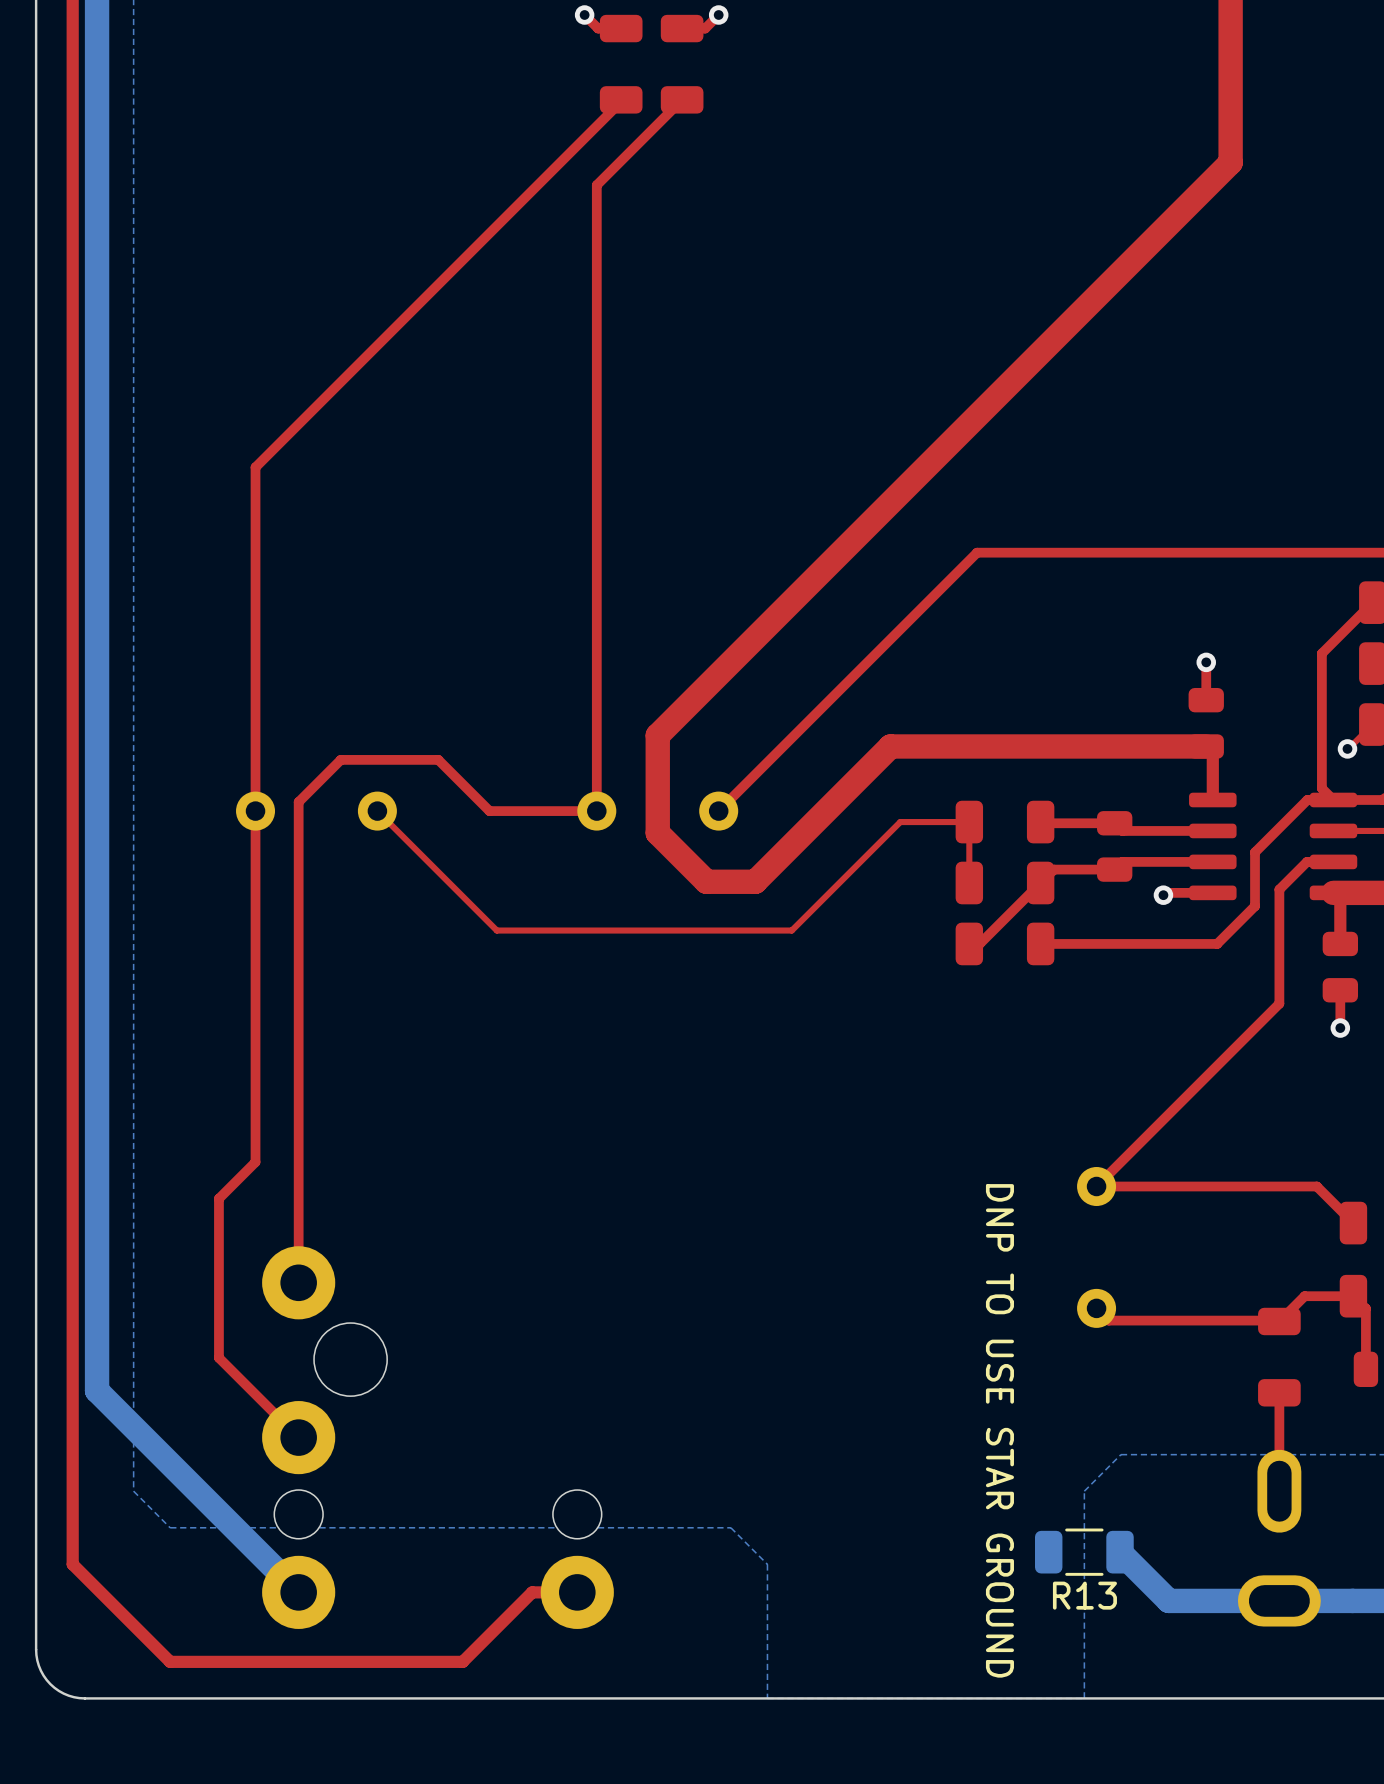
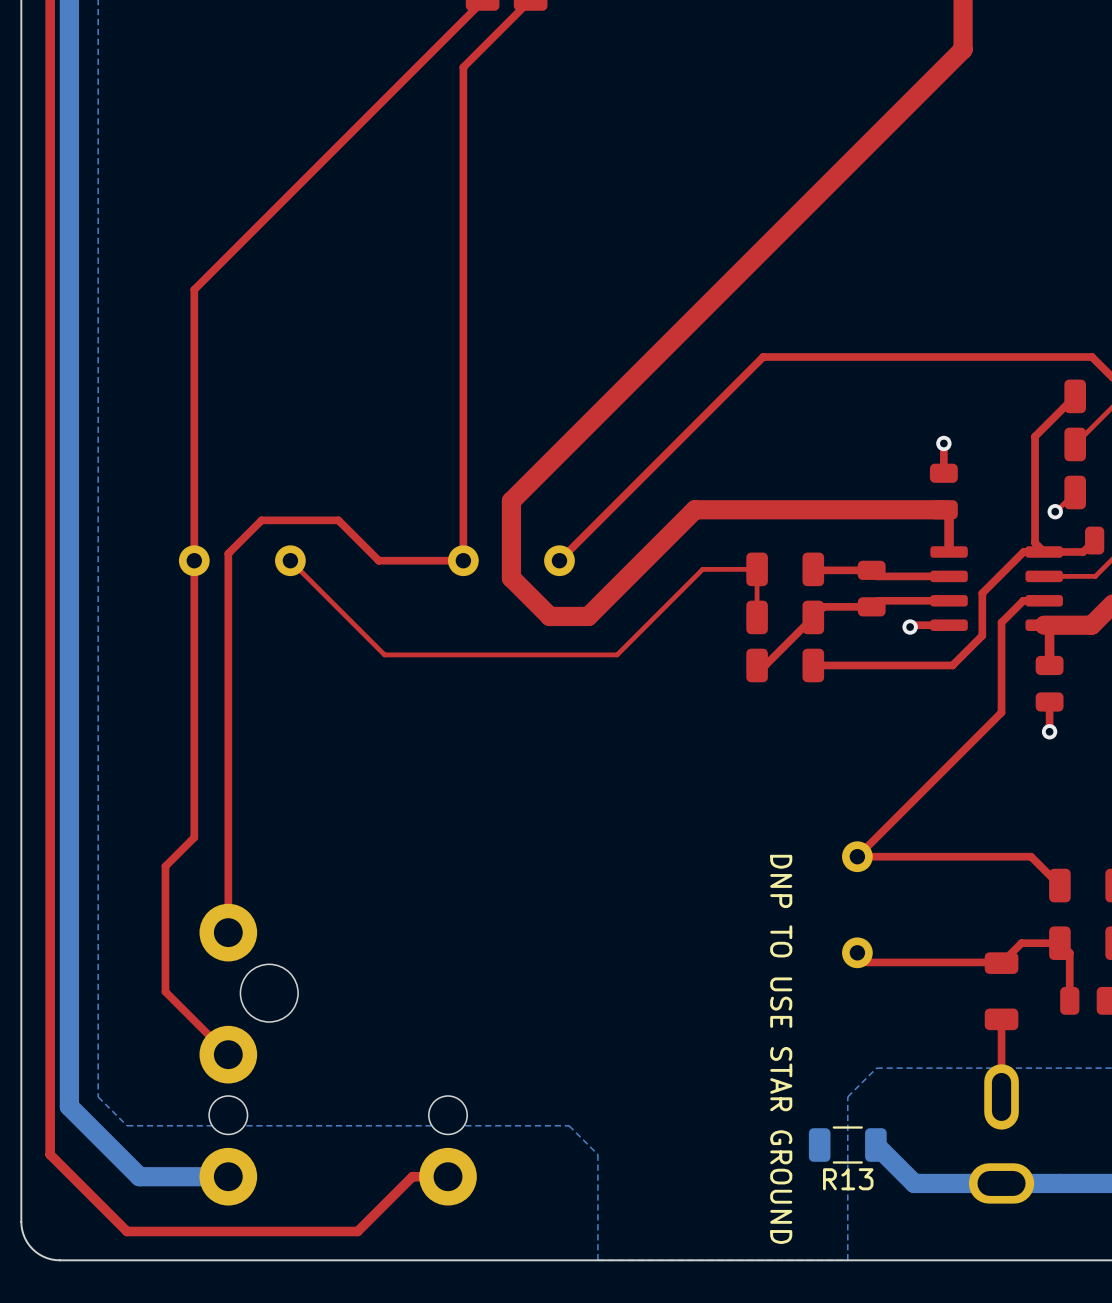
bottom track: (97, 1390) (298, 1592) -> (69, 1017) (69, 1106) (139, 1176) (228, 1176)

